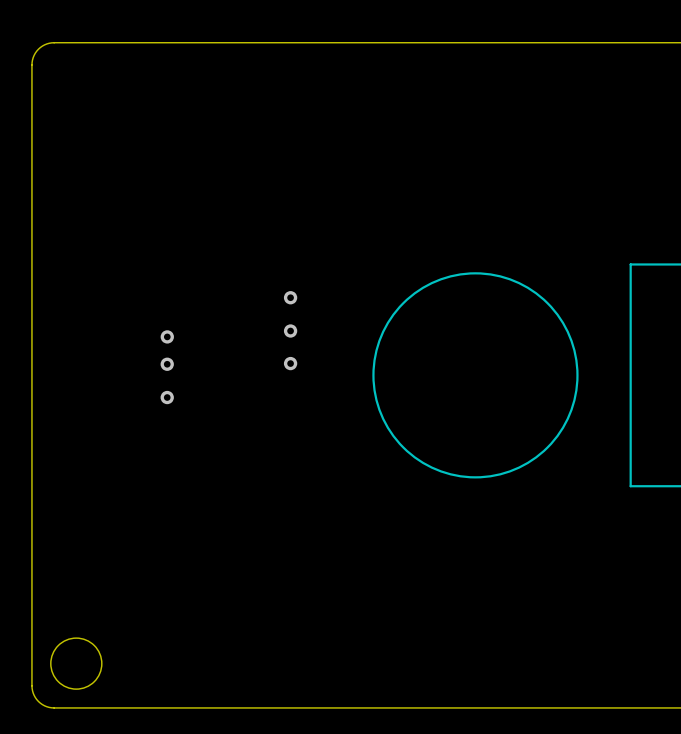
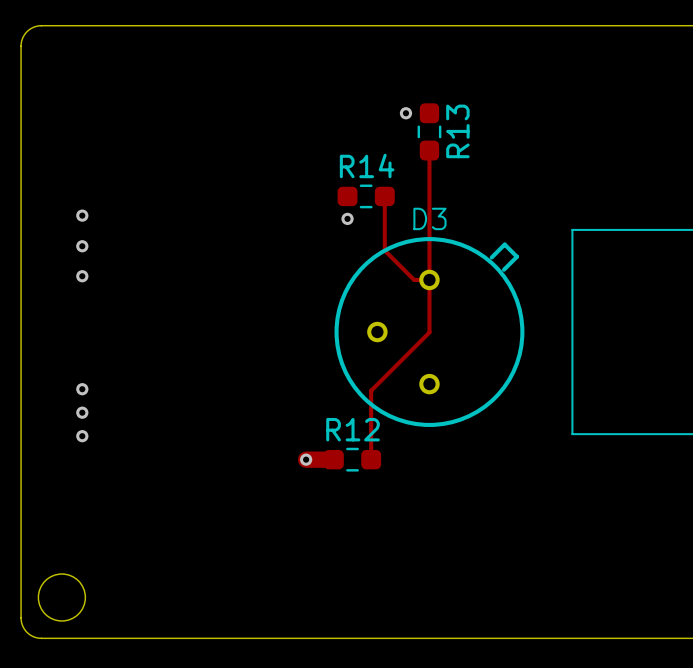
via: none -> (405, 113)
R13: none -> (429, 131)
track: none -> (429, 150) (429, 332) (371, 390) (371, 459)
R14: none -> (366, 196)
track: none -> (384, 196) (384, 250) (414, 279) (429, 279)
via: none -> (82, 215)
via: none -> (347, 218)
drawing: [372, 272, 579, 479] -> none
via: none -> (82, 246)
via: (290, 297) -> none
via: none -> (82, 276)
via: (290, 330) -> none
via: (167, 336) -> none
via: (290, 363) -> none
via: (167, 364) -> none
D3: none -> (429, 332)
via: (167, 397) -> none
via: none -> (82, 389)
via: none -> (82, 412)
via: none -> (82, 436)
track: none -> (306, 459) (333, 459)
via: none -> (306, 459)
R12: none -> (352, 459)

